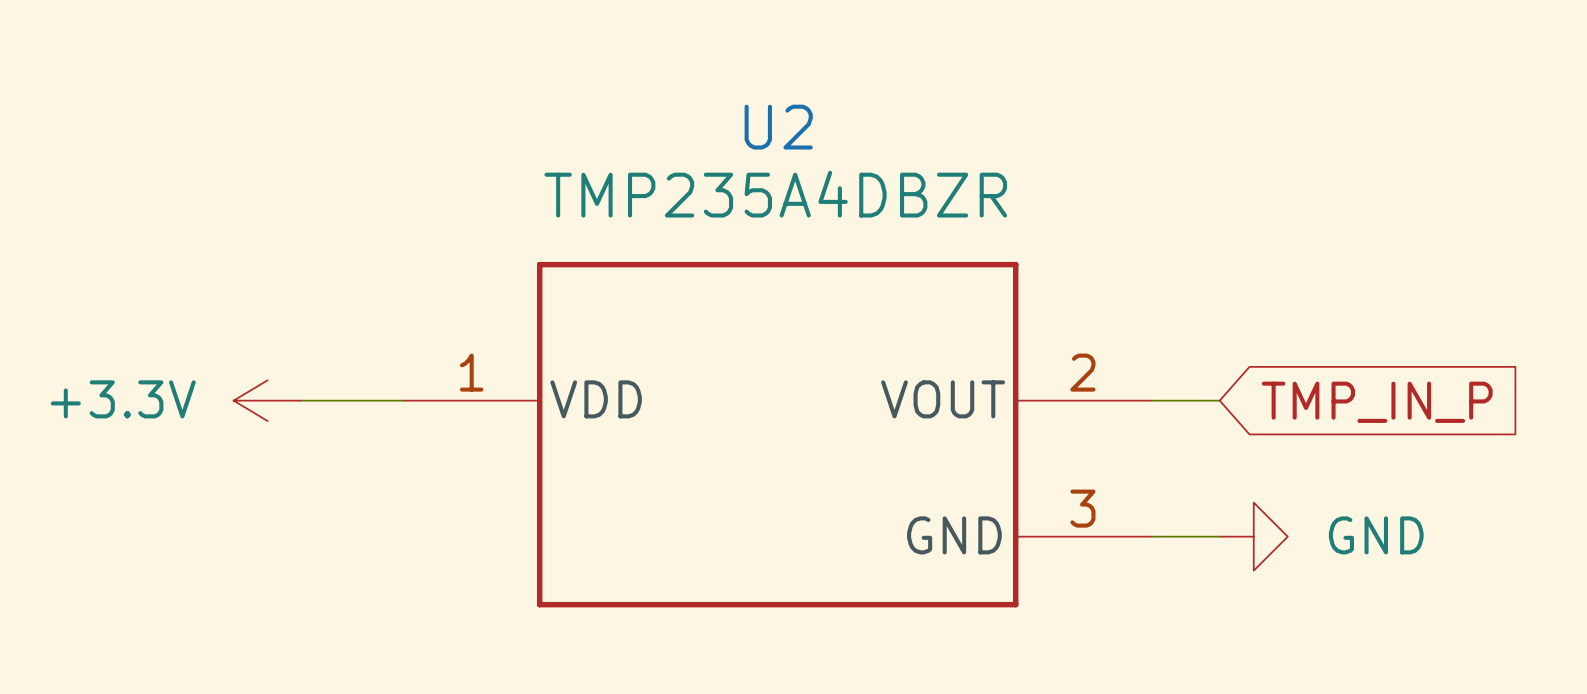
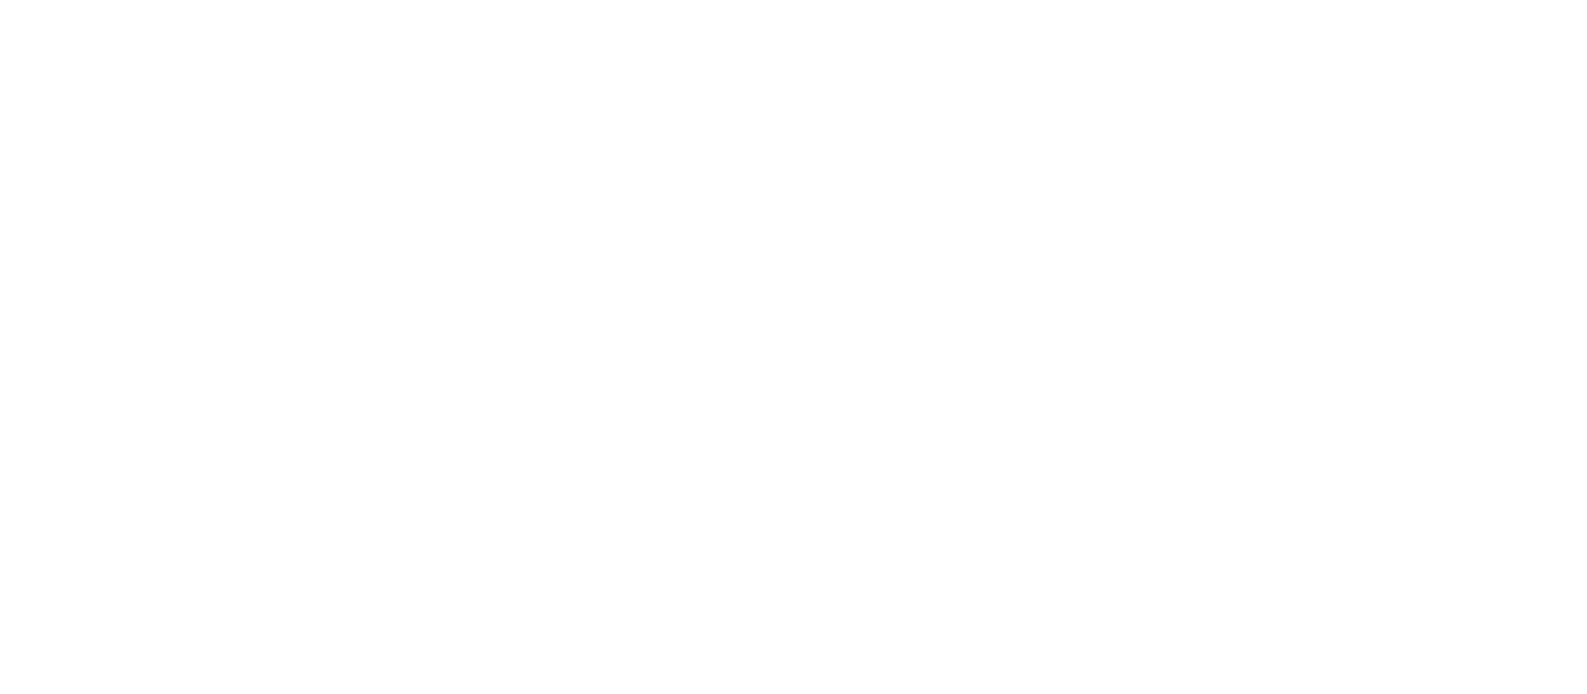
power symbol: +3.3V (267, 400) -> none
wire: (301, 400) (403, 400) -> none
wire: (1151, 400) (1219, 400) -> none
global label: TMP_IN_P (1377, 402) -> none
U2: TMP235A4DBZR (777, 434) -> none
wire: (1151, 536) (1219, 536) -> none
power symbol: GND (1253, 536) -> none

